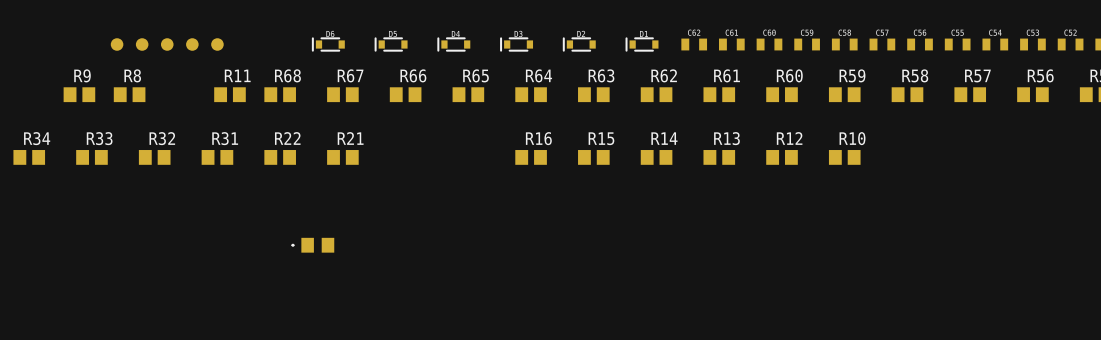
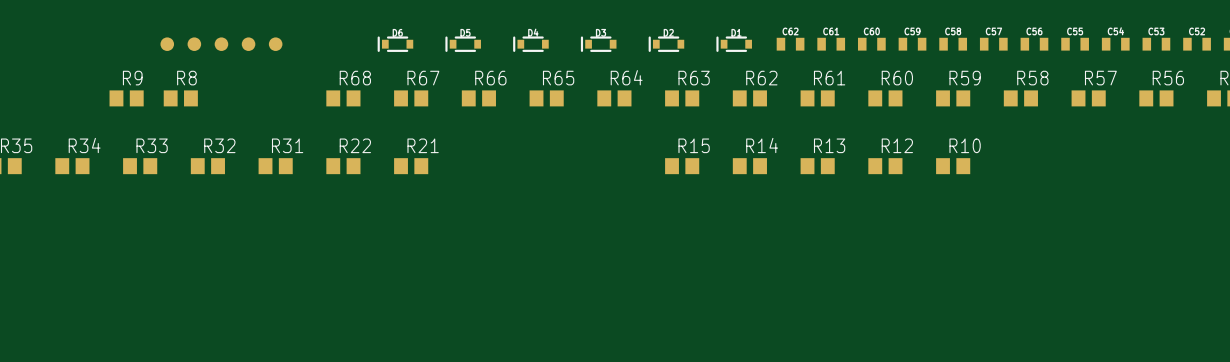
R11: (229, 94) -> none
R16: (531, 157) -> none
part: (312, 245) -> none

